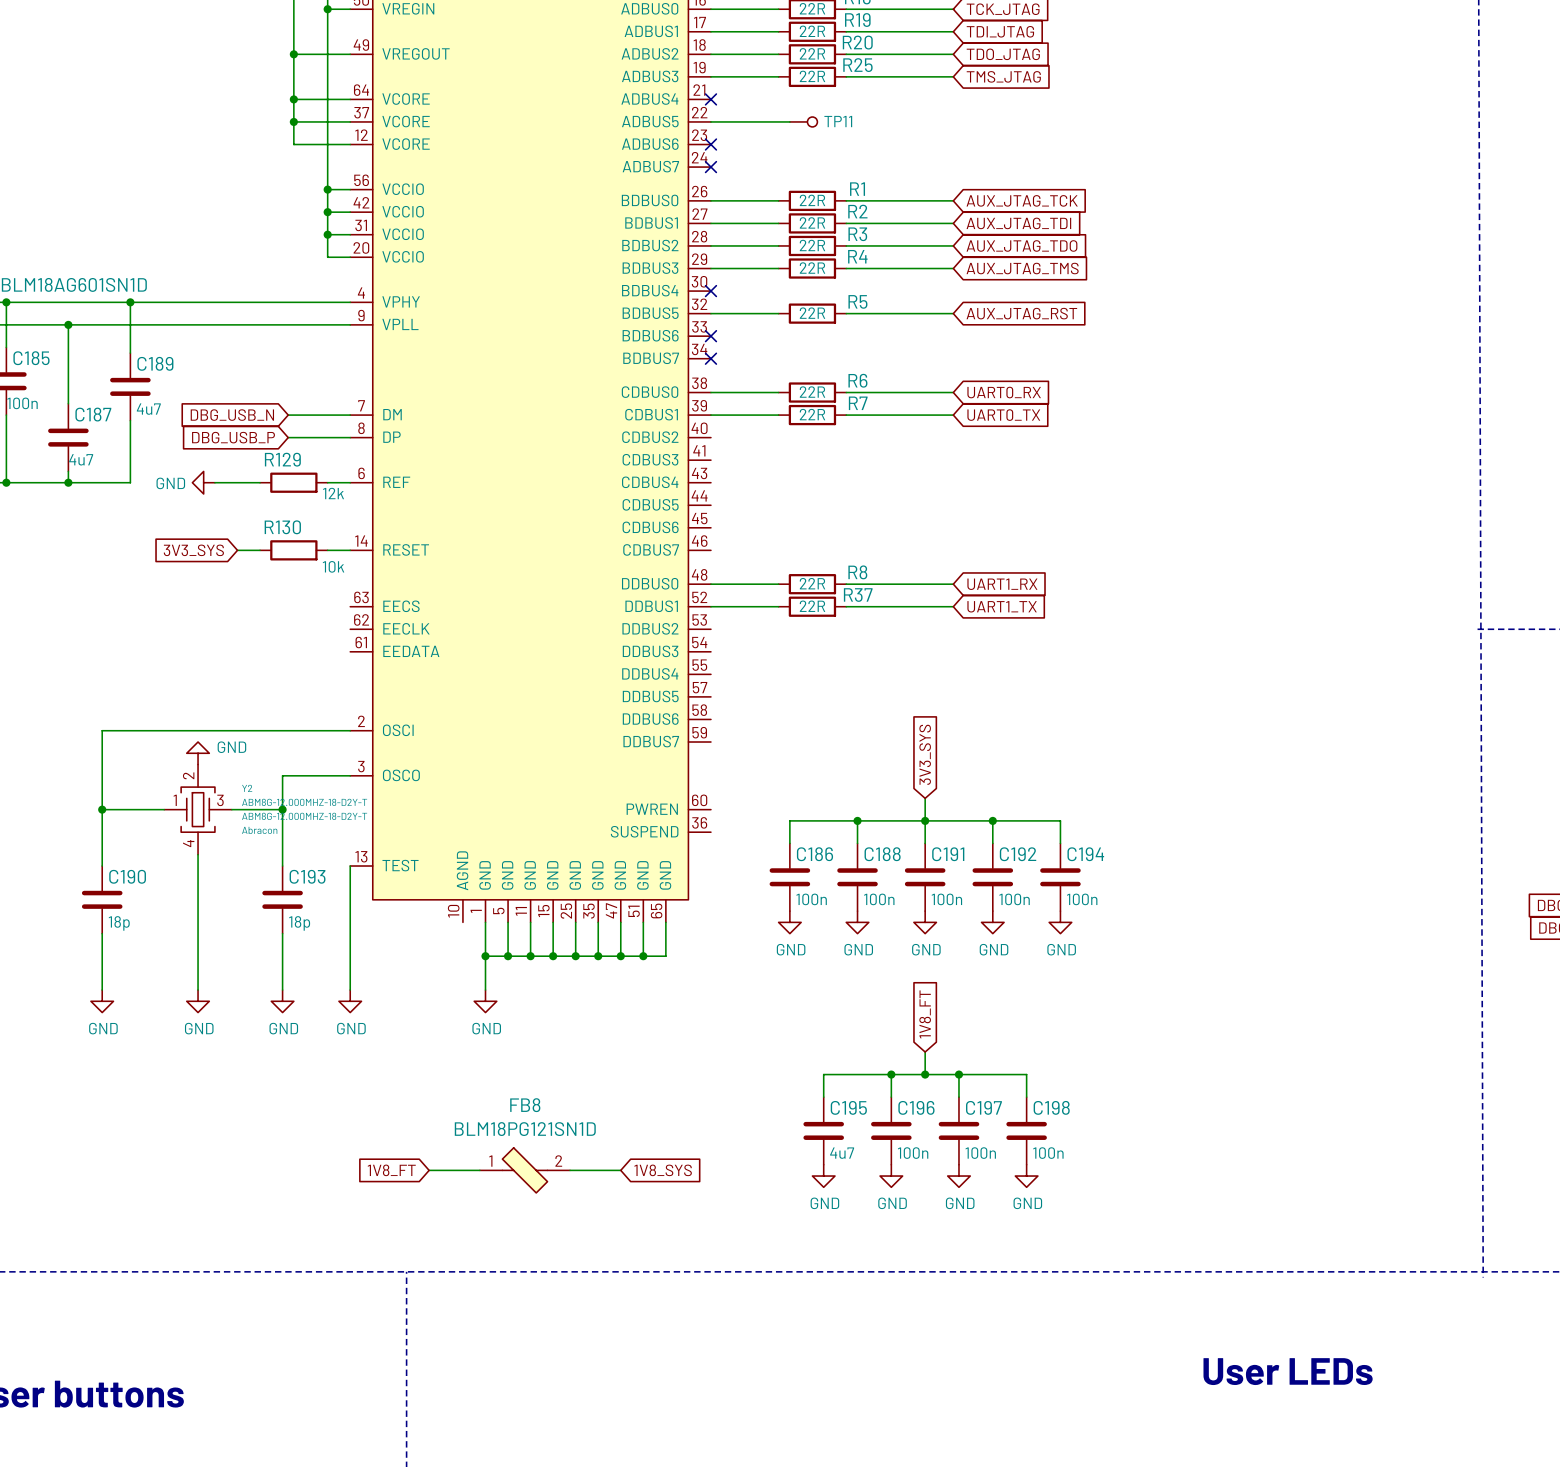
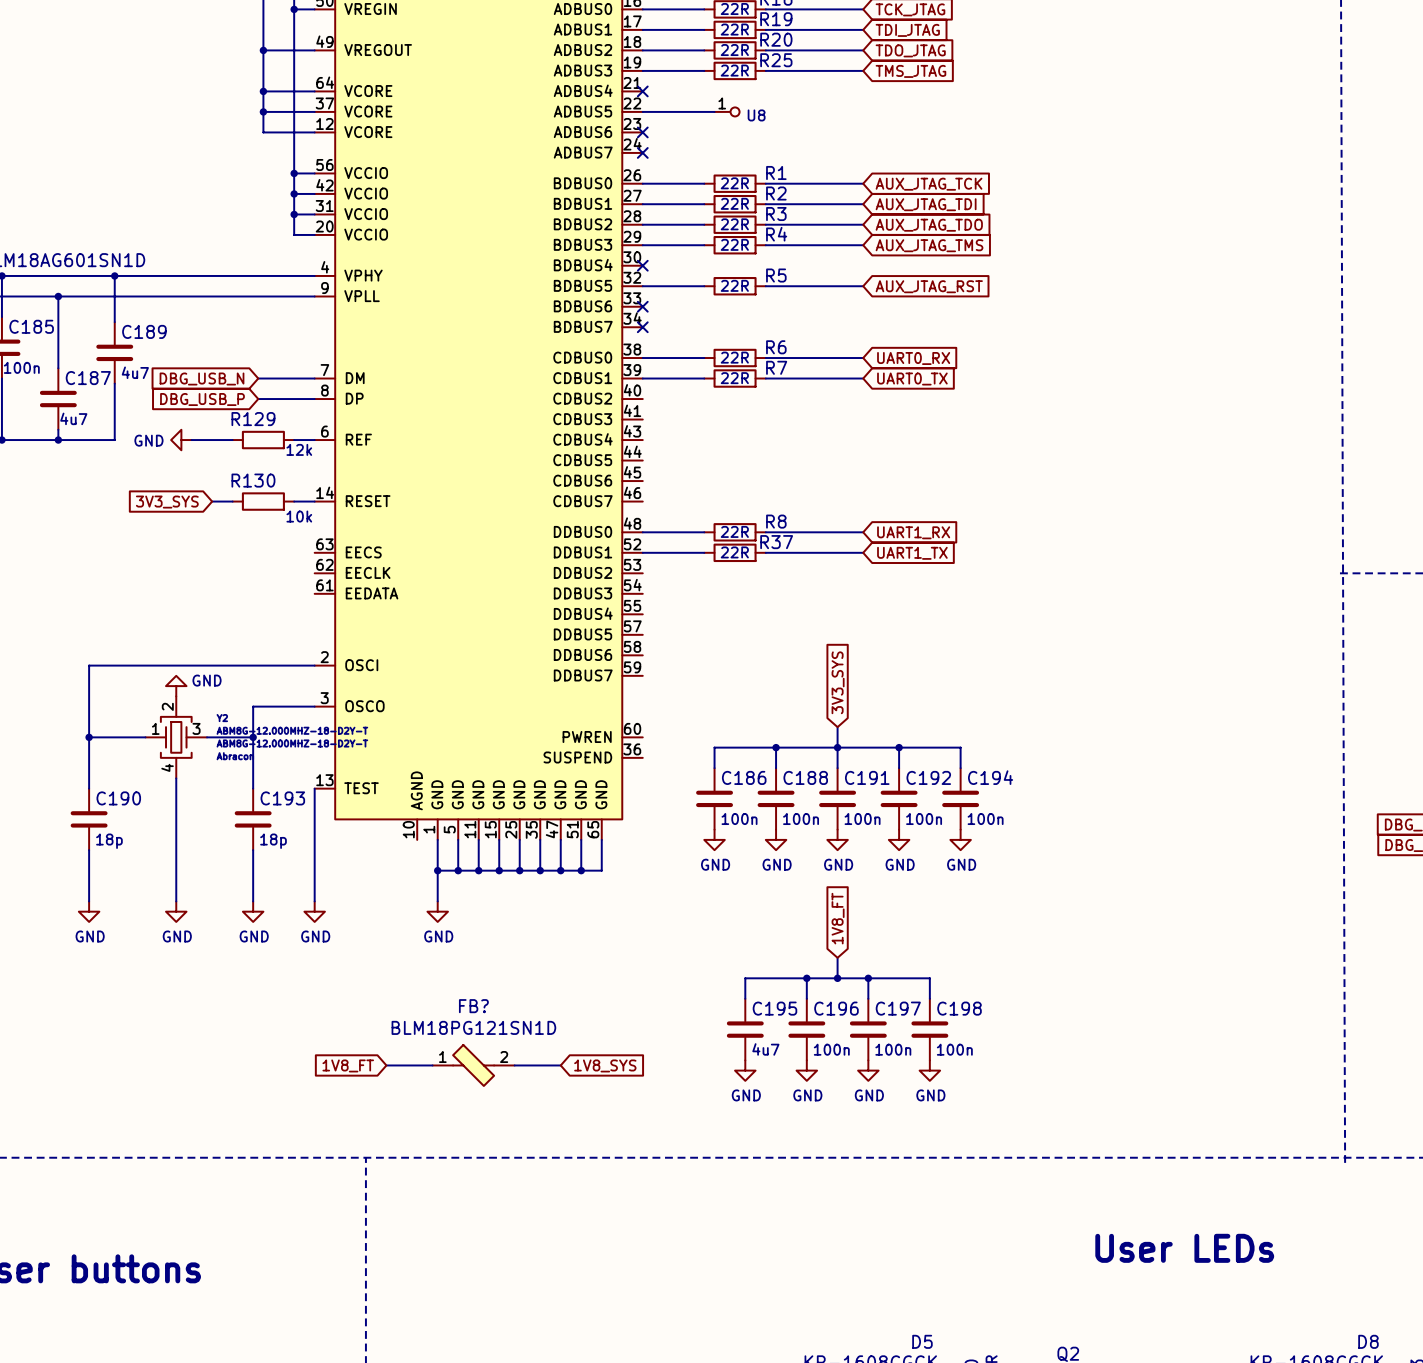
TP11 pin number: none -> 1 (722, 103)
TP11 name: TP11 (838, 121) -> U8 (756, 115)
FB8 name: FB8 (525, 1105) -> FB? (473, 1006)

